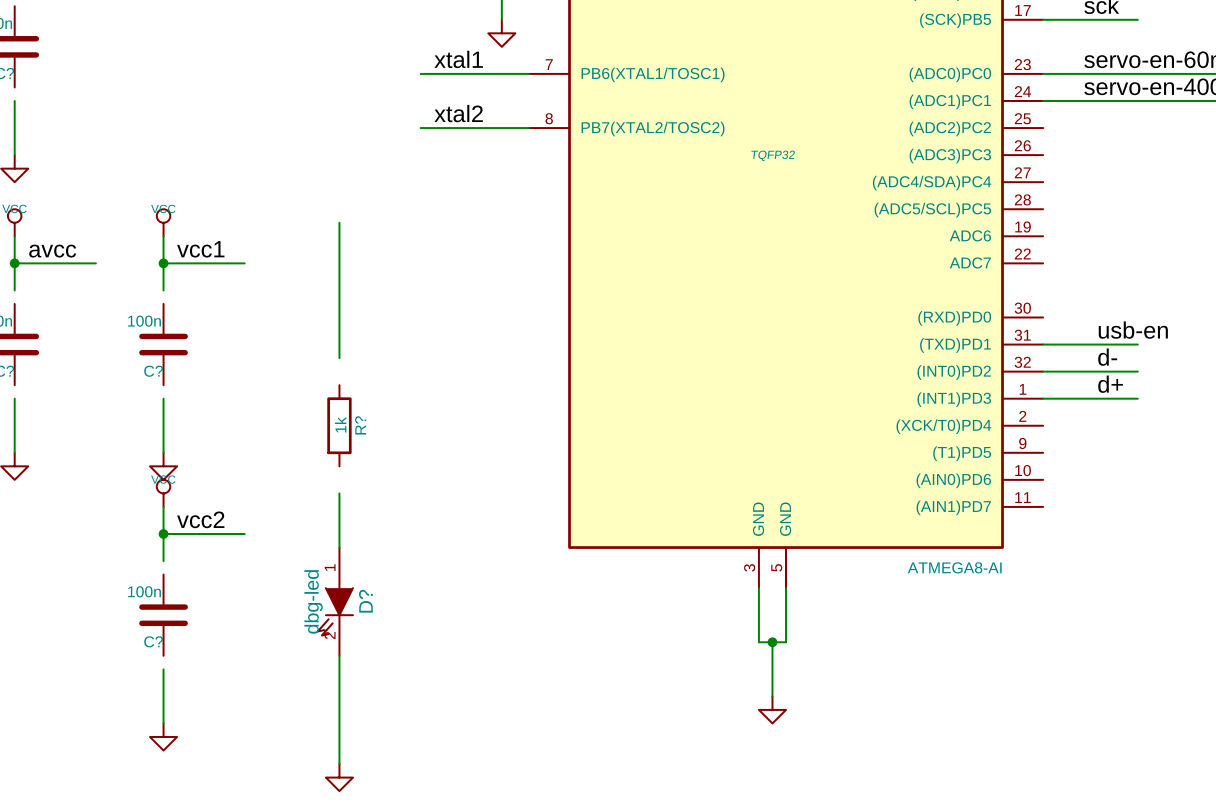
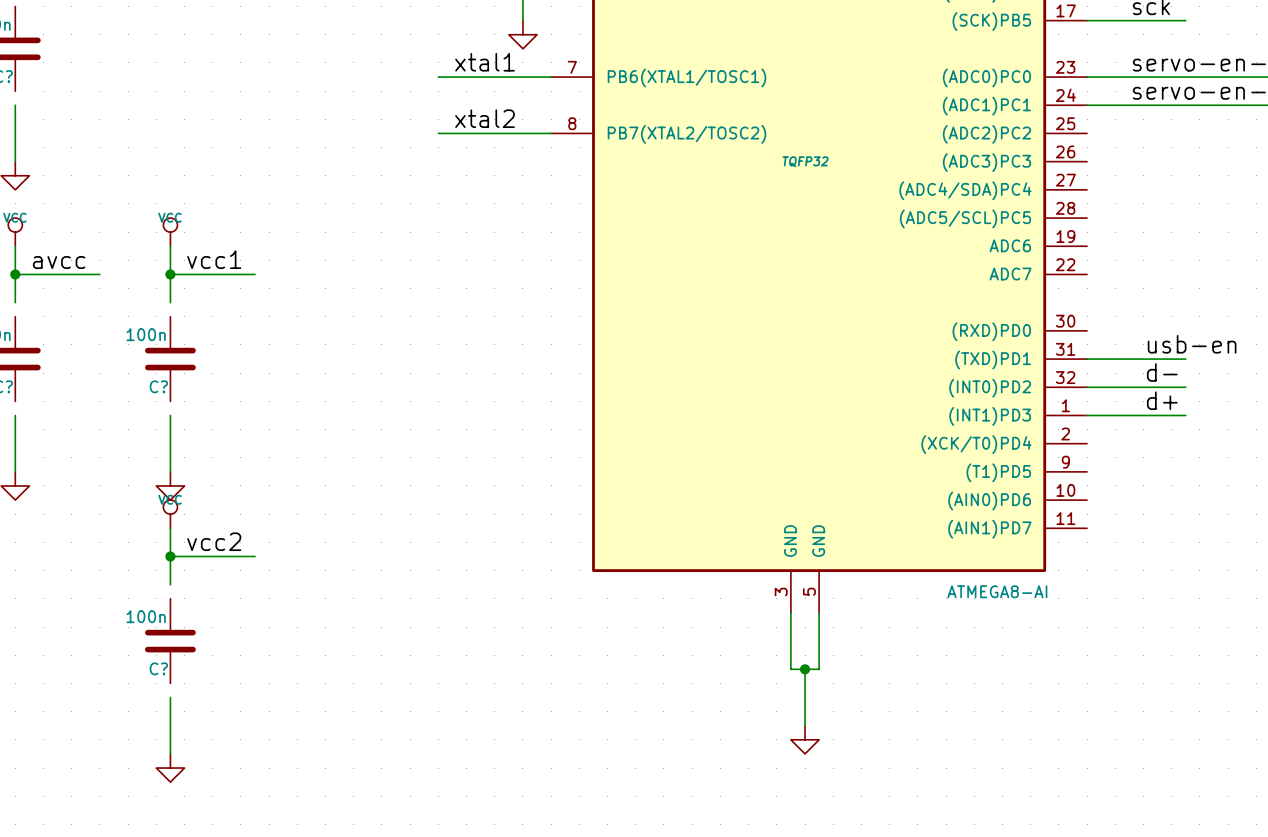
wire: (339, 222) (339, 358) -> none
R?: 1k (339, 425) -> none
wire: (339, 493) (339, 547) -> none
D?: dbg-led (335, 601) -> none
wire: (339, 655) (339, 764) -> none
power symbol: (339, 777) -> none

